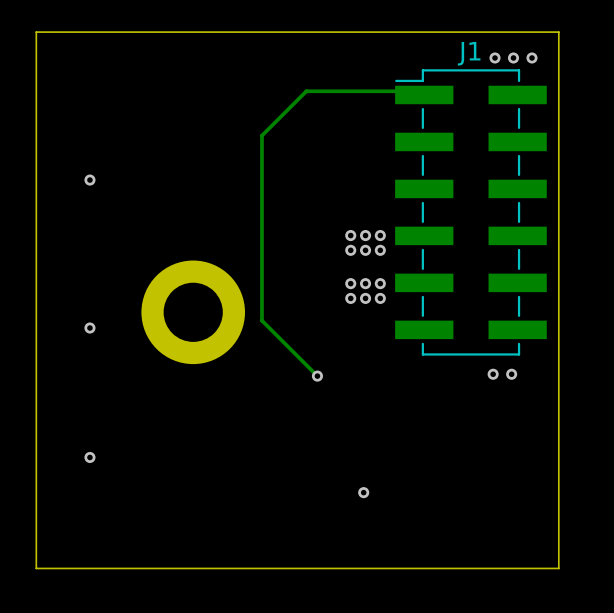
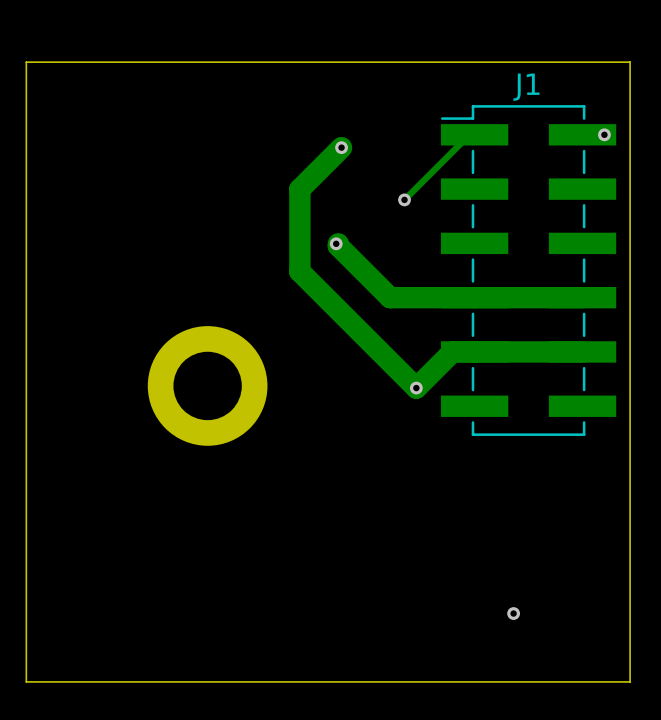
via: (495, 57) -> none
via: (513, 57) -> none
via: (531, 57) -> none
track: (424, 94) (420, 91) (306, 91) (261, 135) (261, 320) (317, 376) -> (474, 134) (469, 134) (404, 199)
via: none -> (604, 134)
track: none -> (341, 147) (299, 189) (299, 271) (416, 388) (452, 351) (582, 351)
via: none -> (341, 147)
via: none -> (404, 199)
via: (89, 180) -> none
via: none -> (336, 243)
track: none -> (338, 243) (390, 297) (582, 297)
via: (350, 235) -> none
via: (365, 235) -> none
via: (380, 235) -> none
via: (350, 250) -> none
via: (365, 250) -> none
via: (380, 250) -> none
via: (350, 283) -> none
via: (365, 283) -> none
via: (380, 283) -> none
via: (350, 298) -> none
via: (365, 298) -> none
via: (380, 298) -> none
via: none -> (416, 388)
via: (89, 328) -> none
via: (493, 374) -> none
via: (511, 374) -> none
via: (317, 376) -> none
via: (89, 457) -> none
via: (363, 492) -> none
via: none -> (513, 613)

